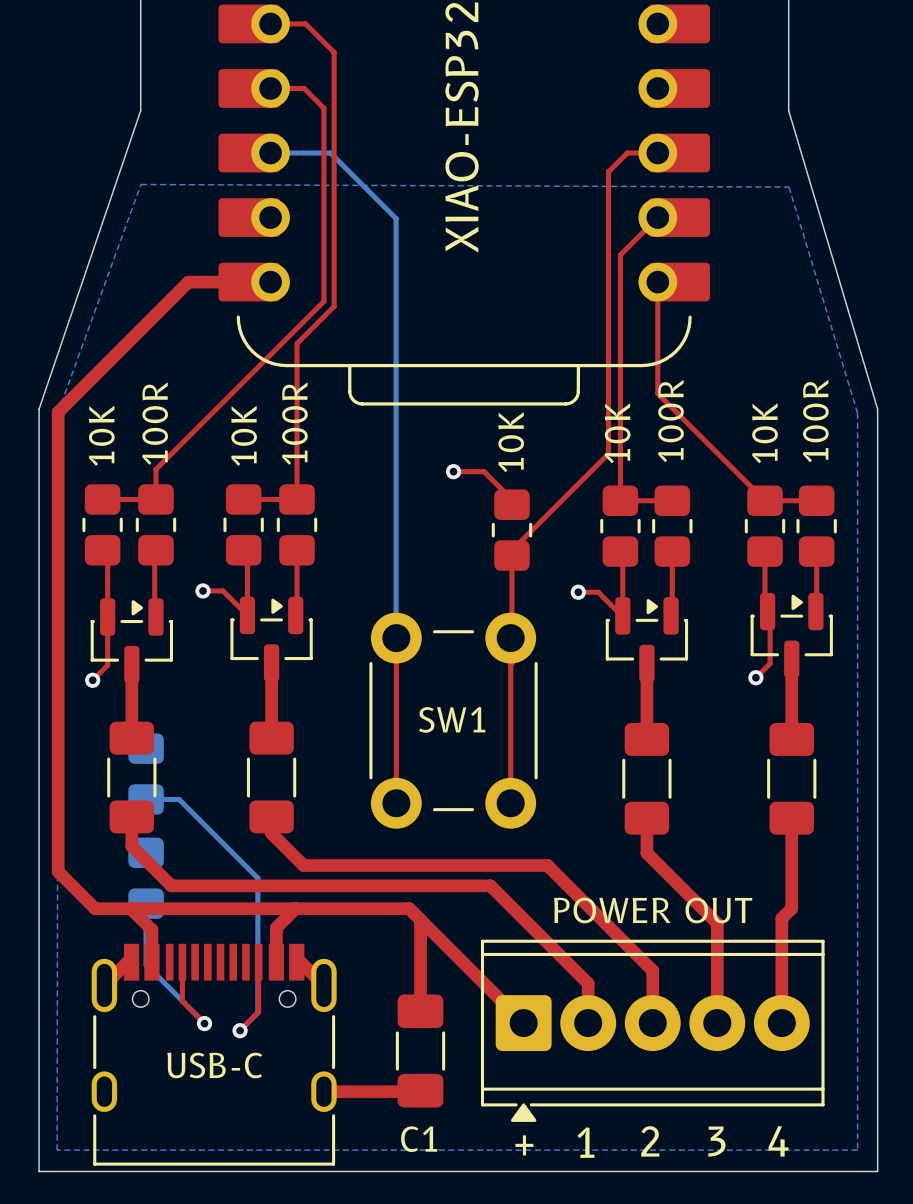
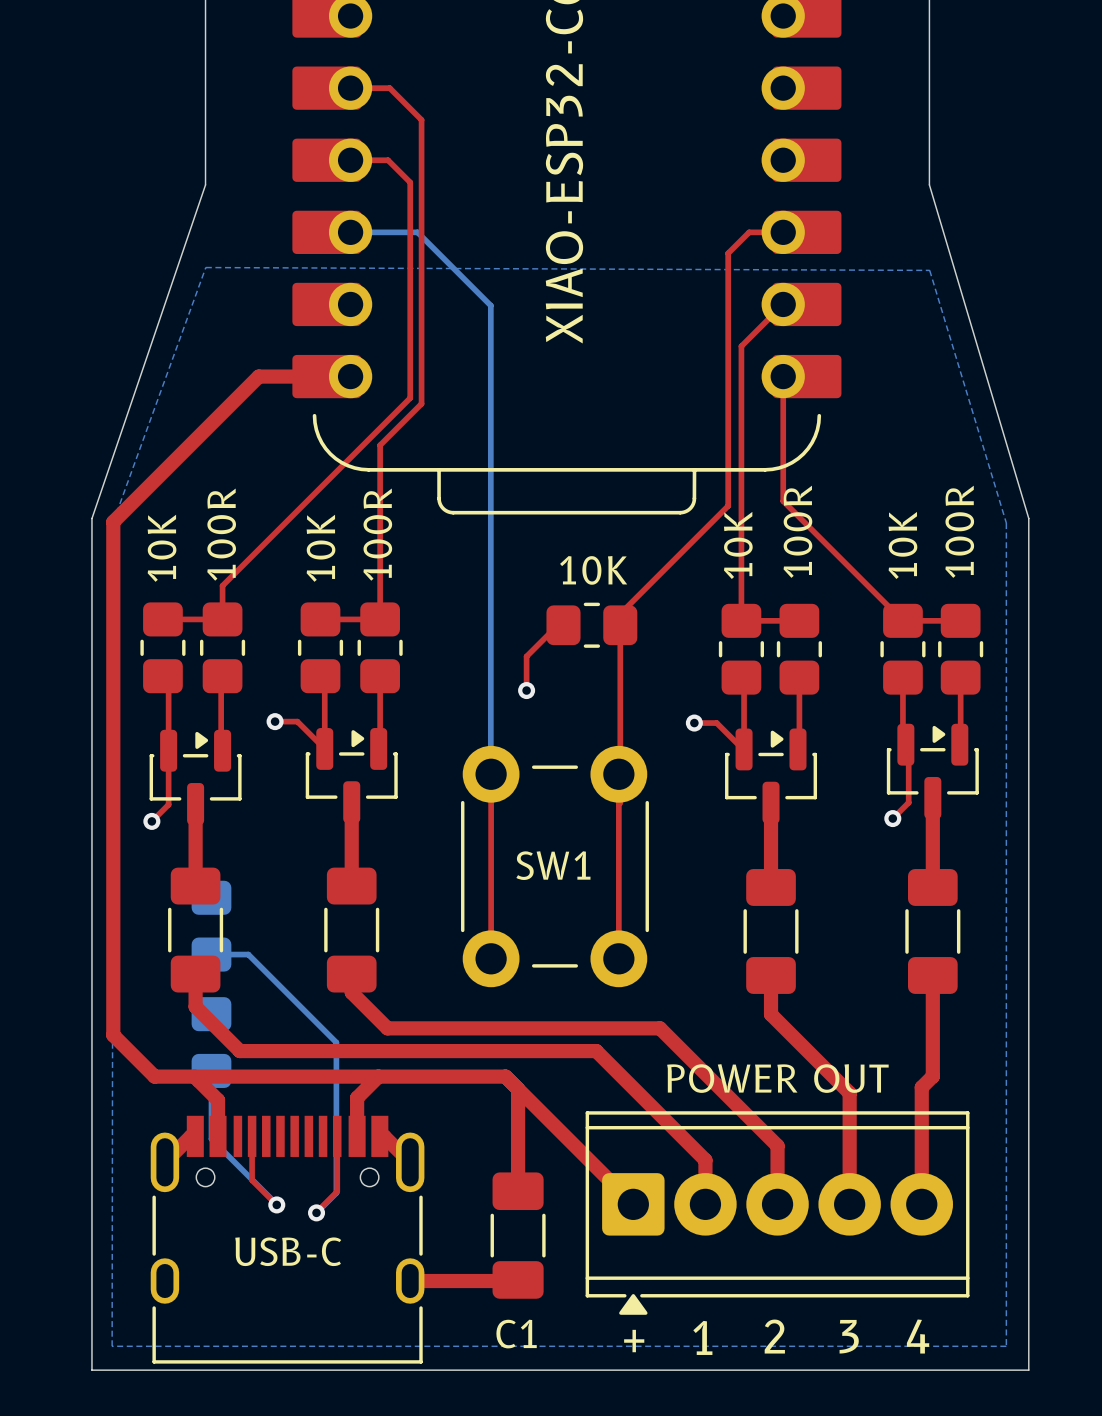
top track: (608, 397) (608, 453) (511, 550) -> (728, 506) (620, 613) (620, 676)
top track: (453, 471) (484, 471) (511, 499) -> none
via position: (453, 471) -> (526, 690)
top track: none -> (557, 625) (526, 656) (526, 690)
part rotation: 0° (511, 530) -> 90° clockwise (591, 625)

